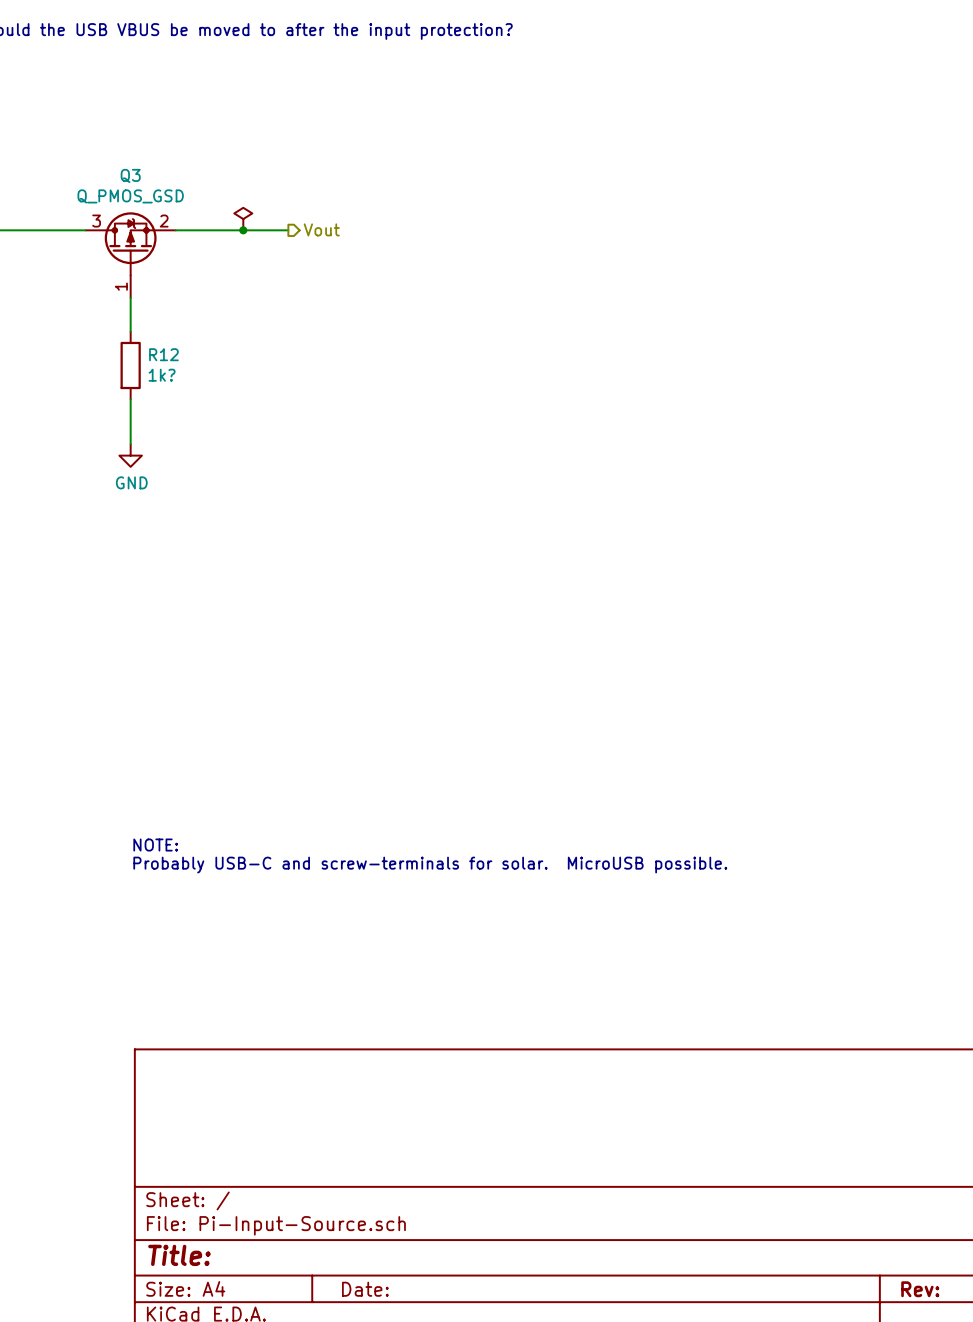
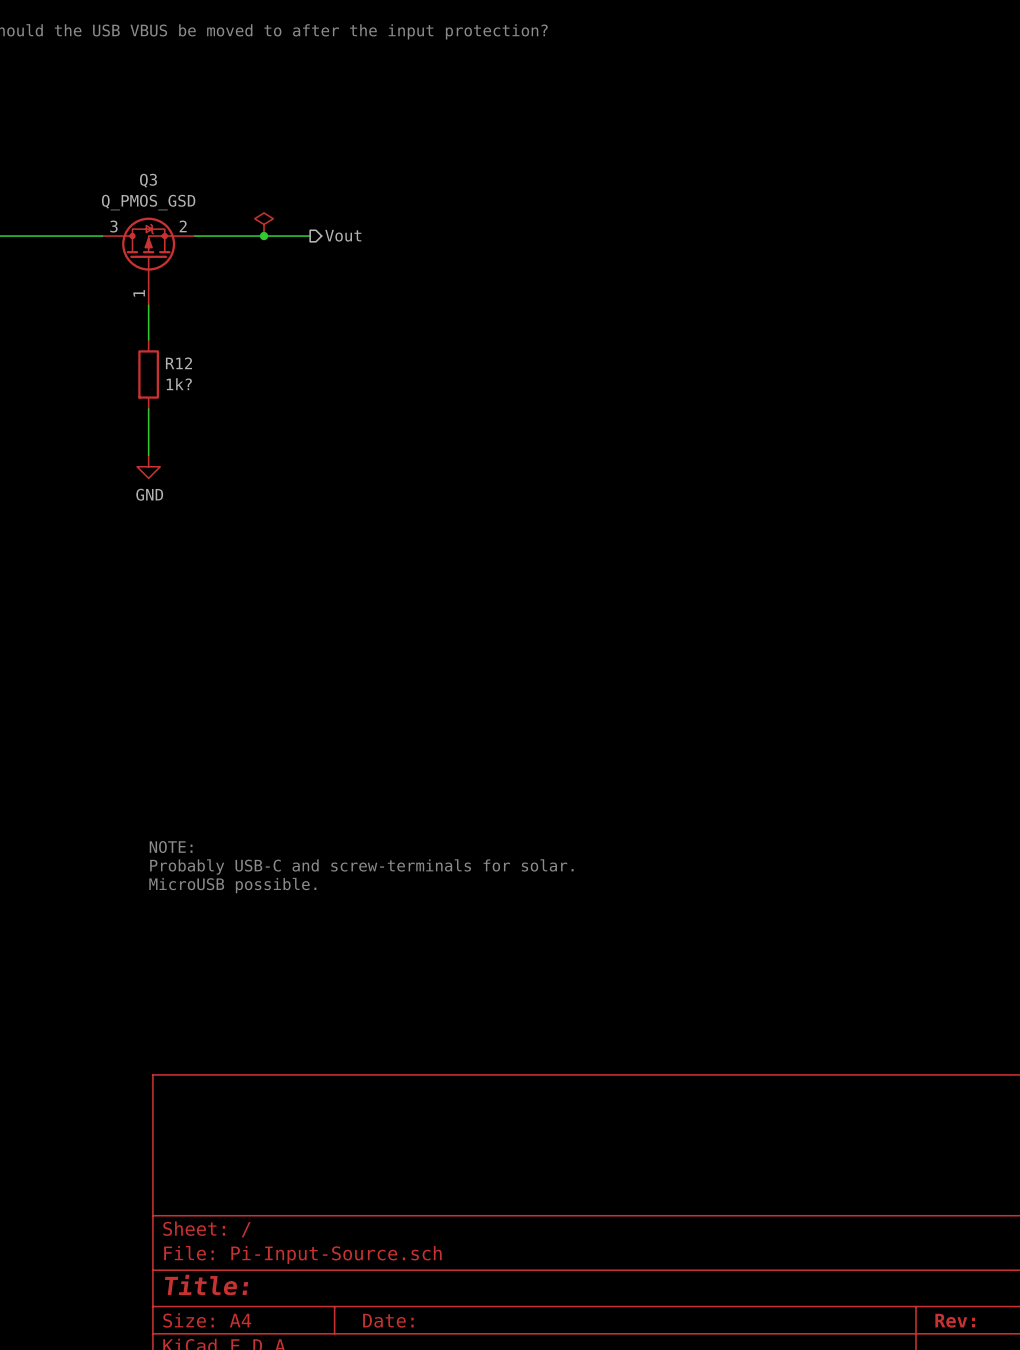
text: none -> NOTE: (171, 847)
text: NOTE: (155, 845) -> Probably USB-C and screw-terminals for solar. (361, 866)
text: Probably USB-C and screw-terminals for solar. MicroUSB possible. (430, 865) -> MicroUSB possible. (232, 885)

